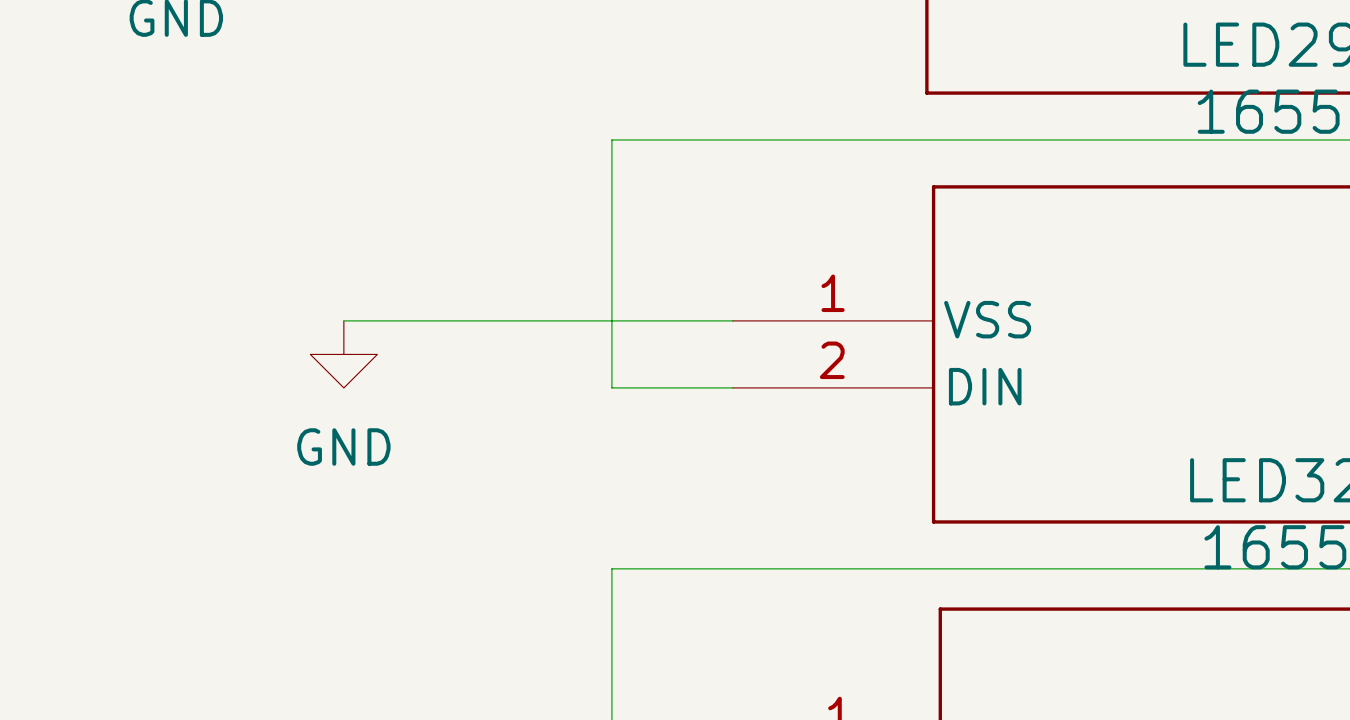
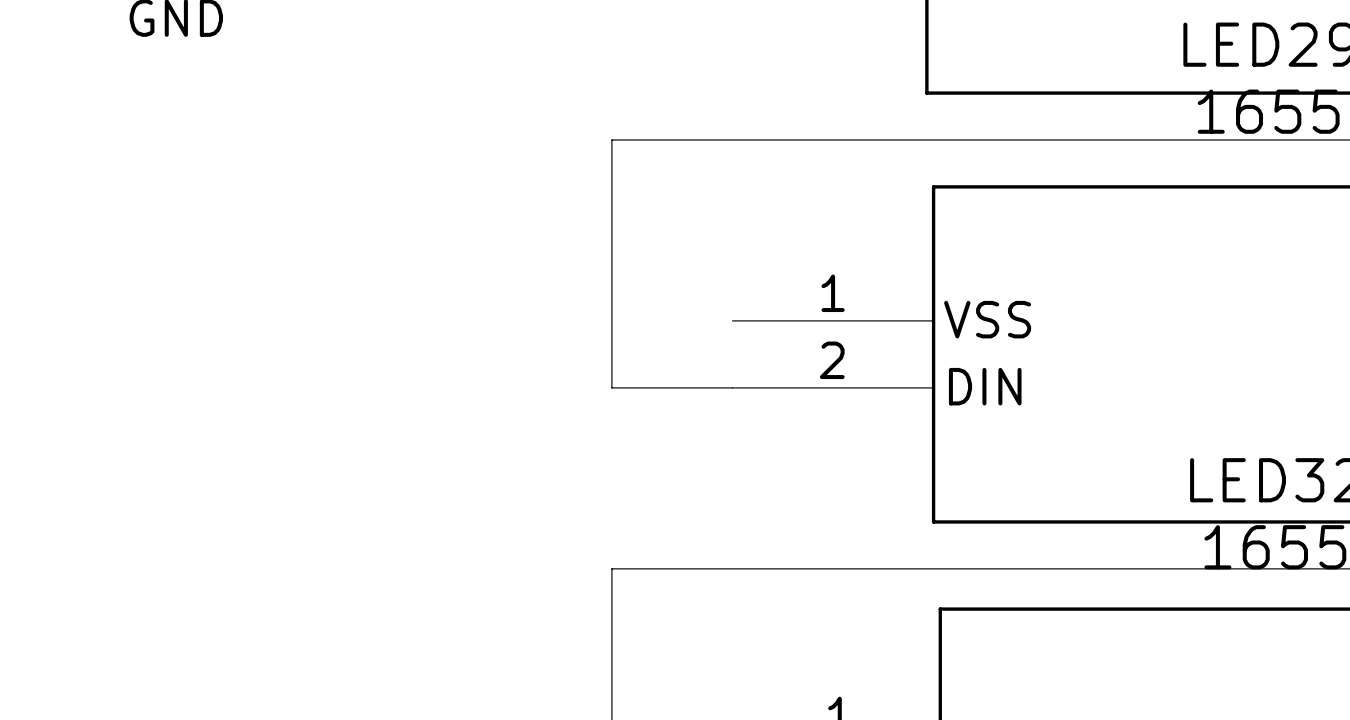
wire: (343, 320) (732, 320) -> none
power symbol: GND (343, 354) -> none

